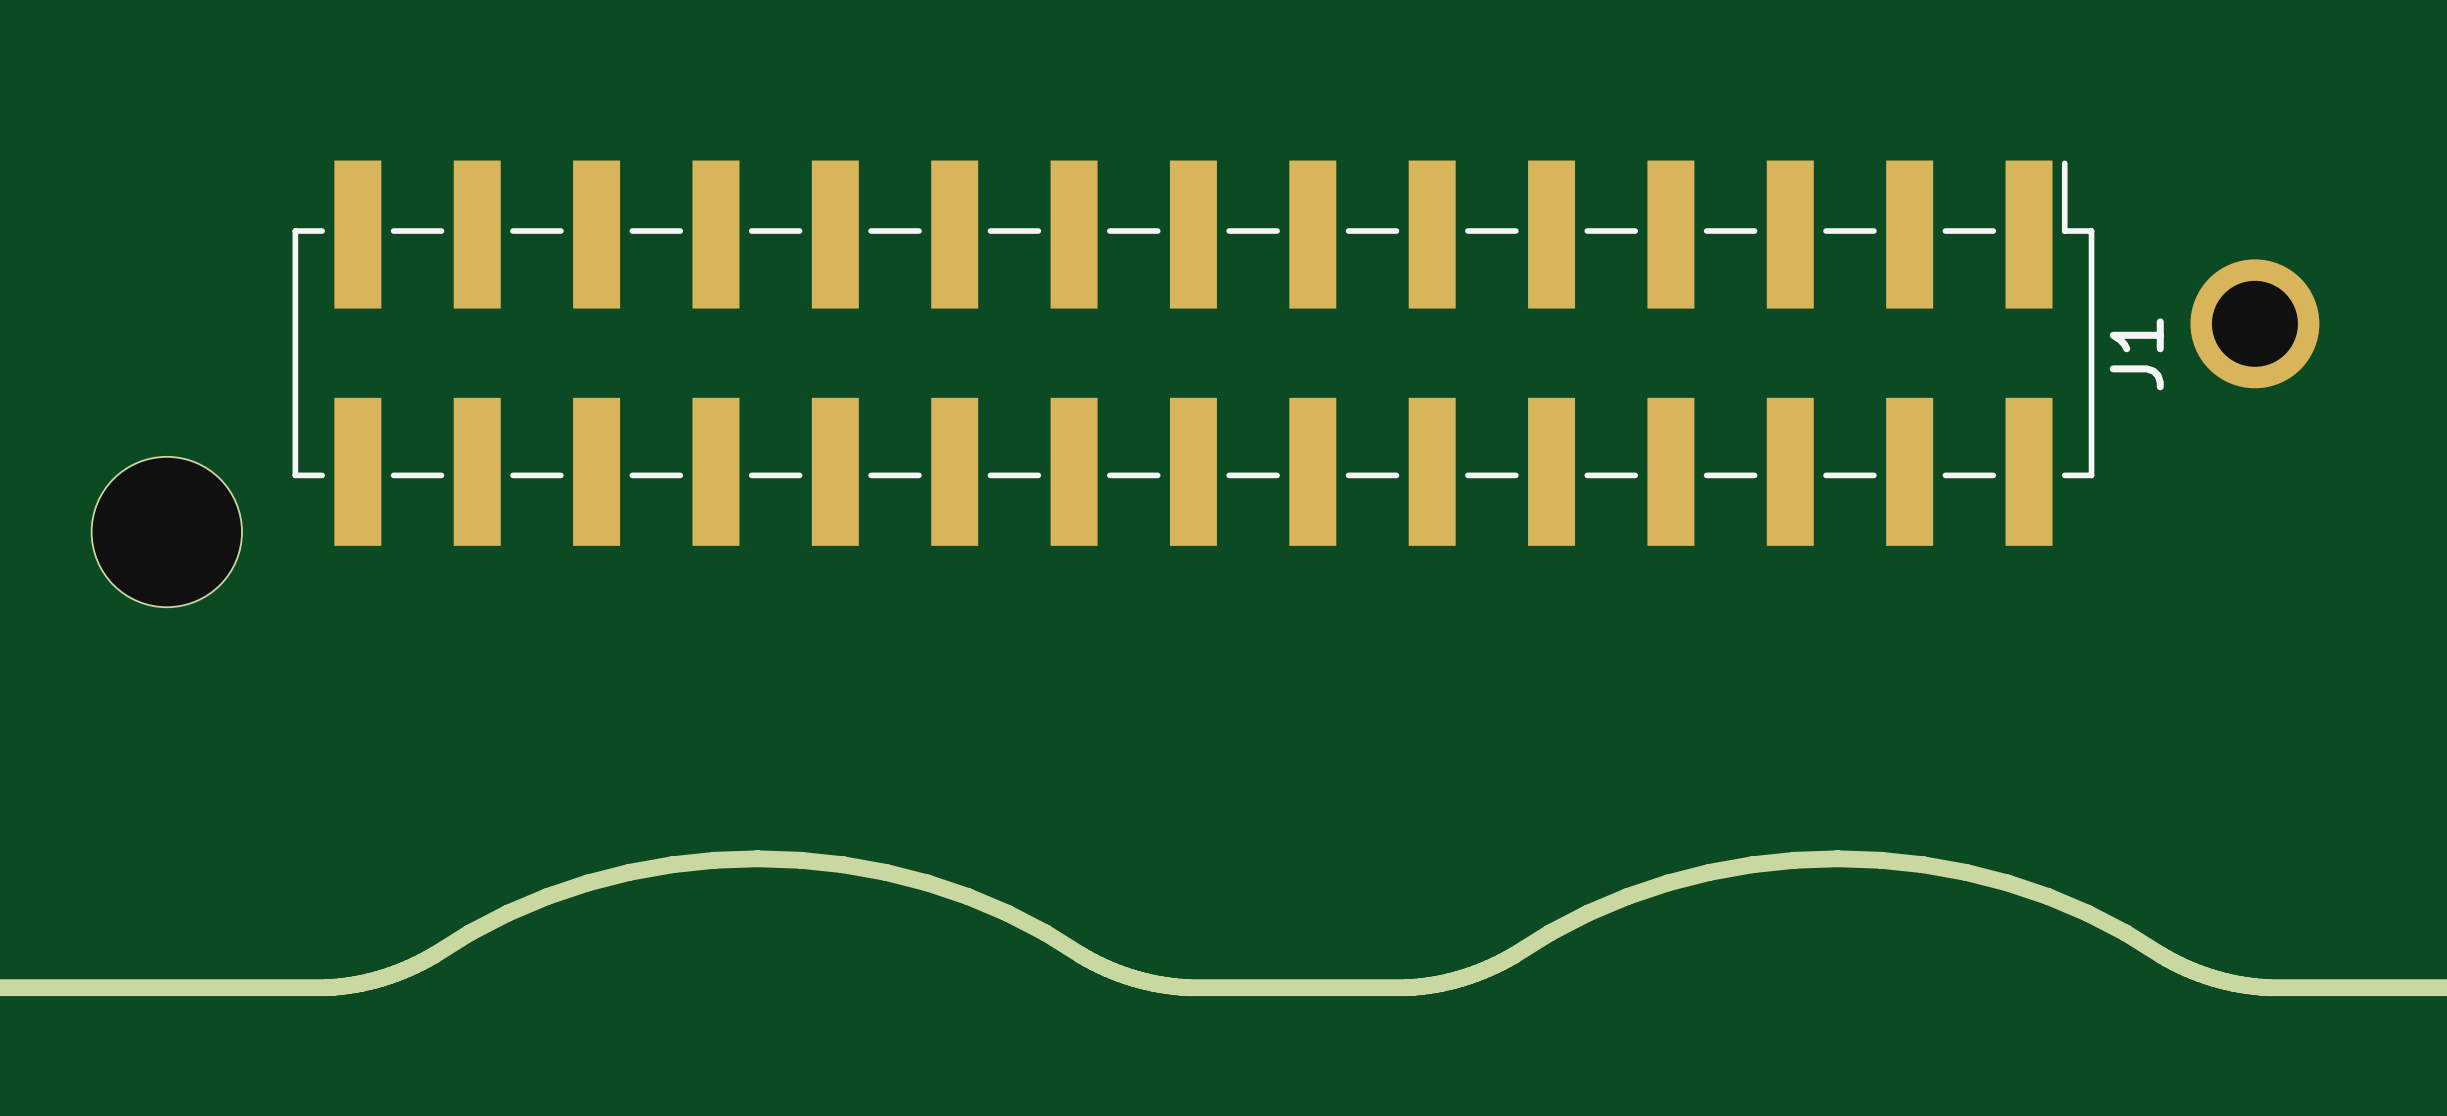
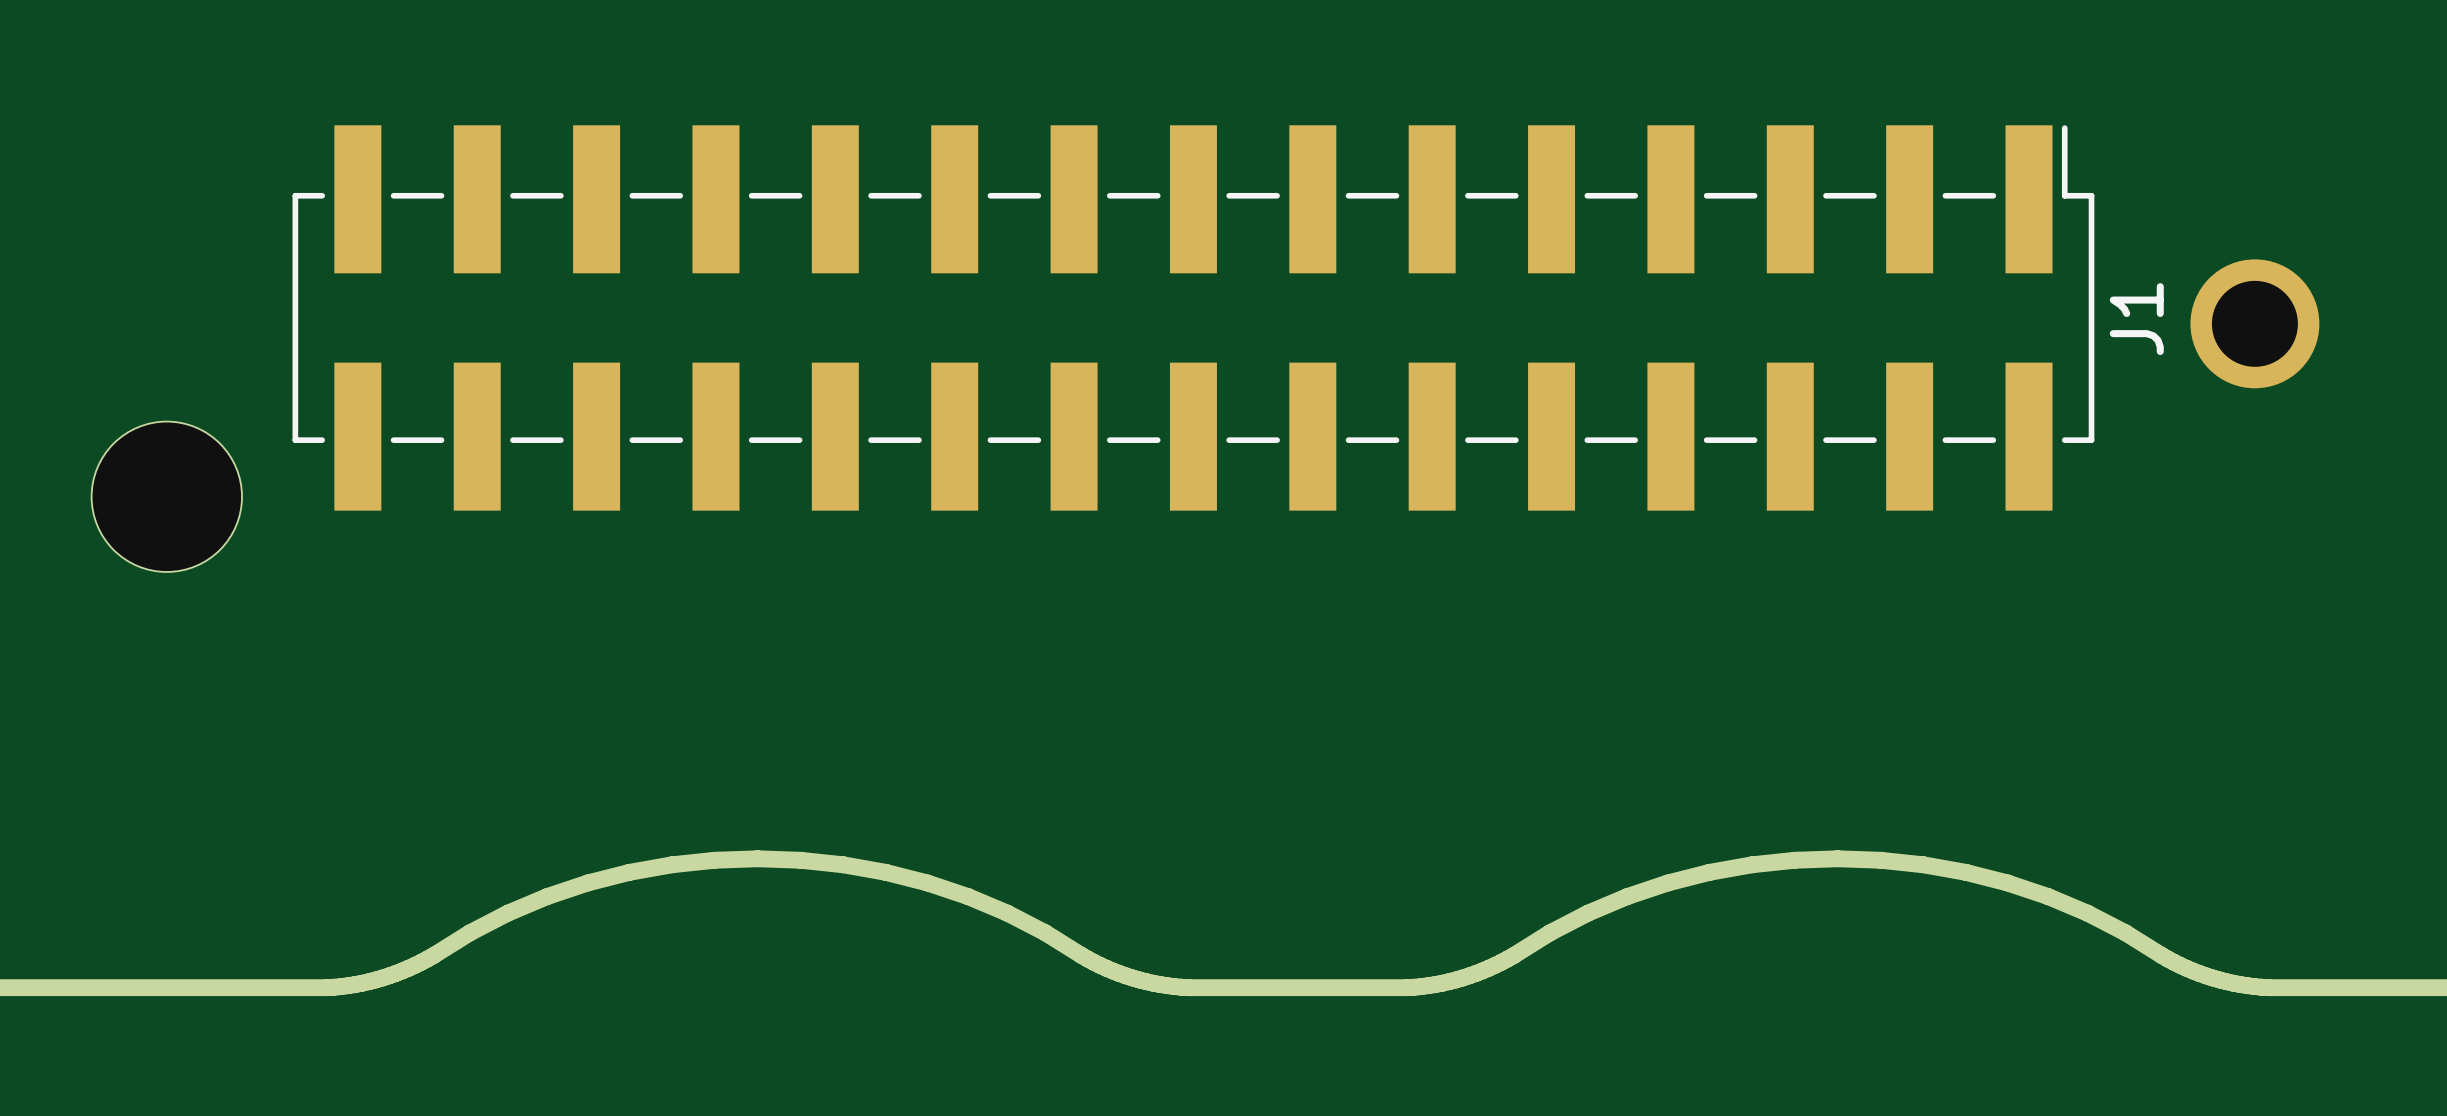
J1 position: (1193, 353) -> (1193, 317)
part position: (166, 532) -> (166, 496)

